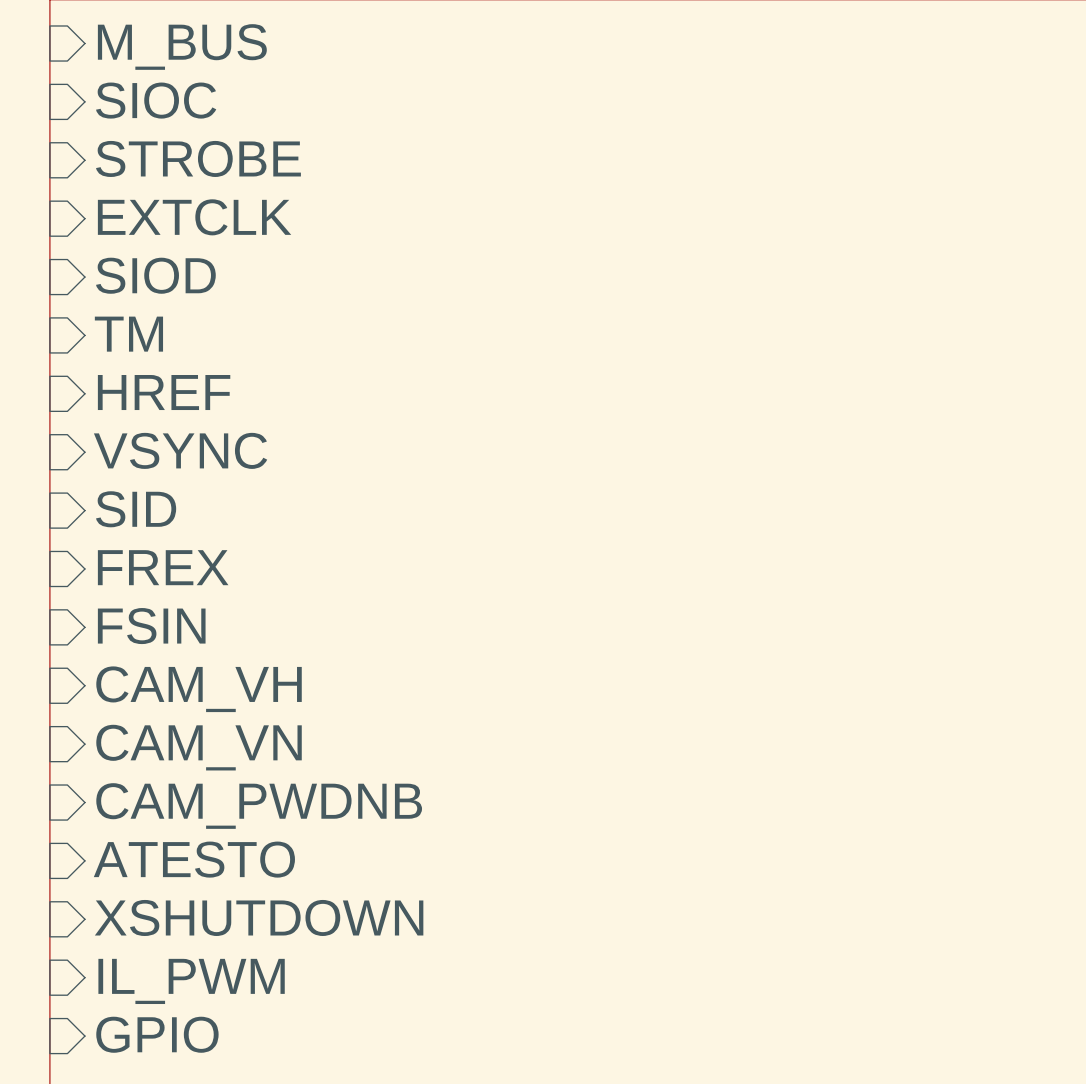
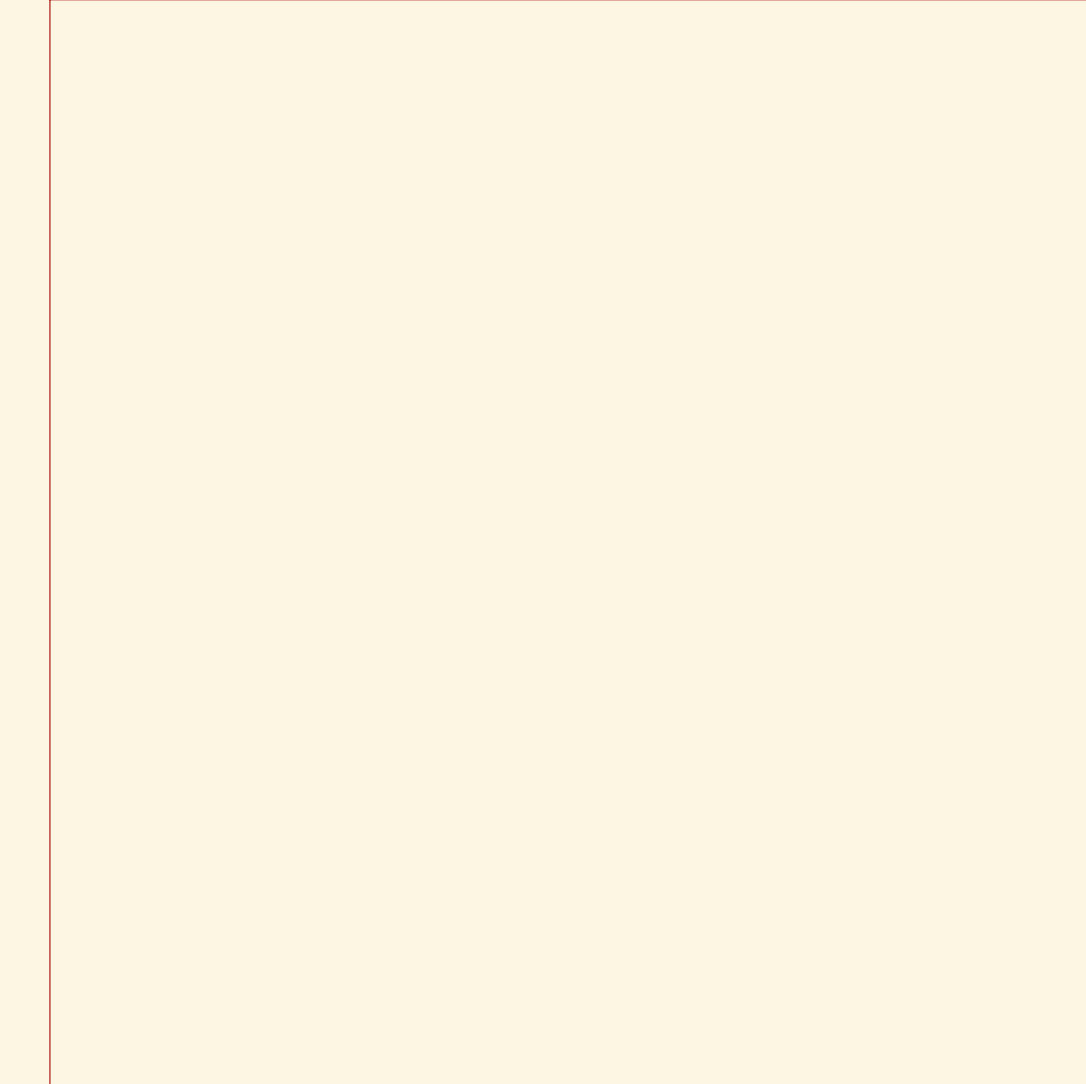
sheet pin: M_BUS (182, 46) -> none
sheet pin: SIOC (156, 100) -> none
sheet pin: STROBE (198, 158) -> none
sheet pin: EXTCLK (194, 217) -> none
sheet pin: SIOD (155, 275) -> none
sheet pin: TM (128, 334) -> none
sheet pin: HREF (164, 392) -> none
sheet pin: VSYNC (180, 450) -> none
sheet pin: SID (136, 509) -> none
sheet pin: FREX (163, 567) -> none
sheet pin: FSIN (151, 626) -> none
sheet pin: CAM_VH (199, 689) -> none
sheet pin: CAM_VN (199, 747) -> none
sheet pin: CAM_PWDNB (259, 806) -> none
sheet pin: ATESTO (194, 859) -> none
sheet pin: XSHUTDOWN (259, 917) -> none
sheet pin: IL_PWM (191, 981) -> none
sheet pin: GPIO (157, 1034) -> none

